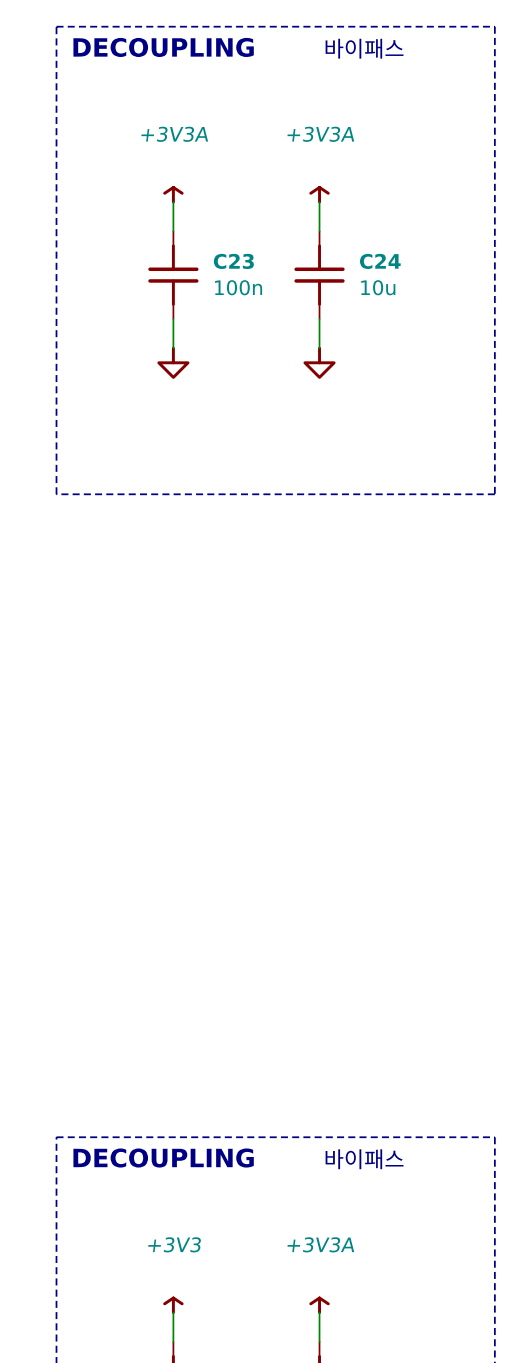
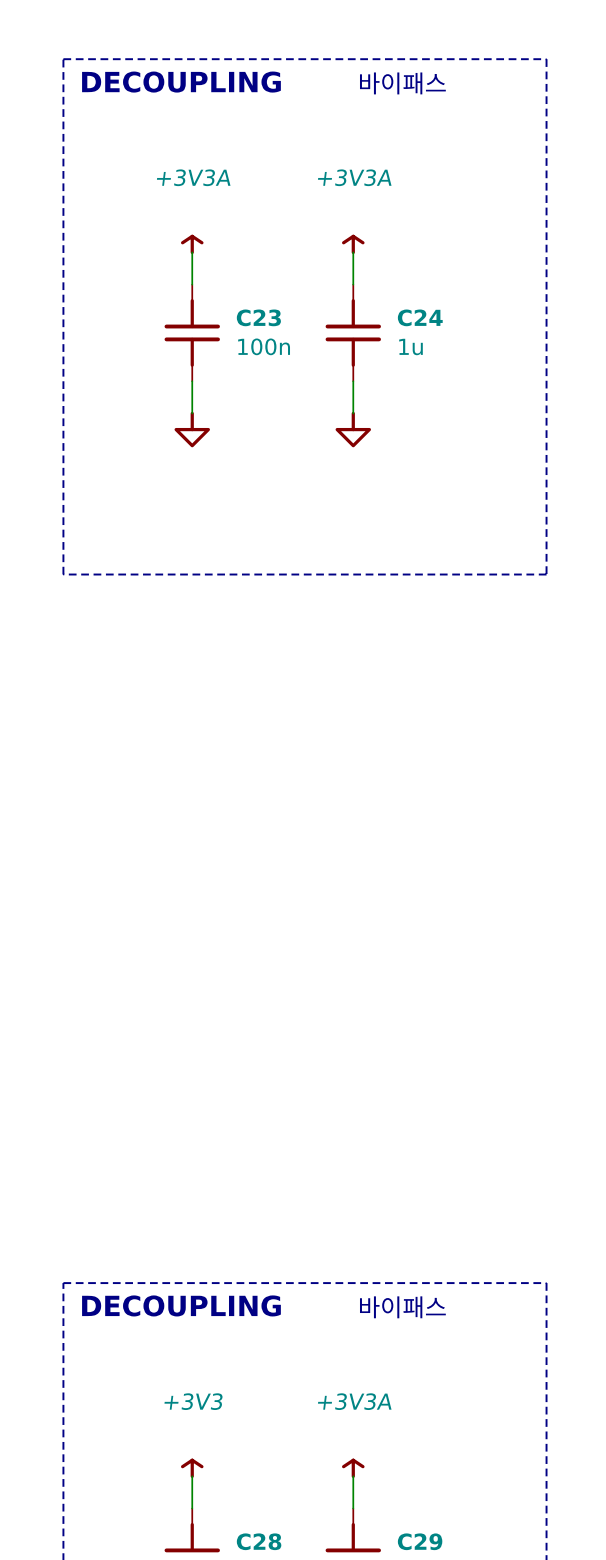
C24 value: 10u (378, 287) -> 1u (411, 347)

